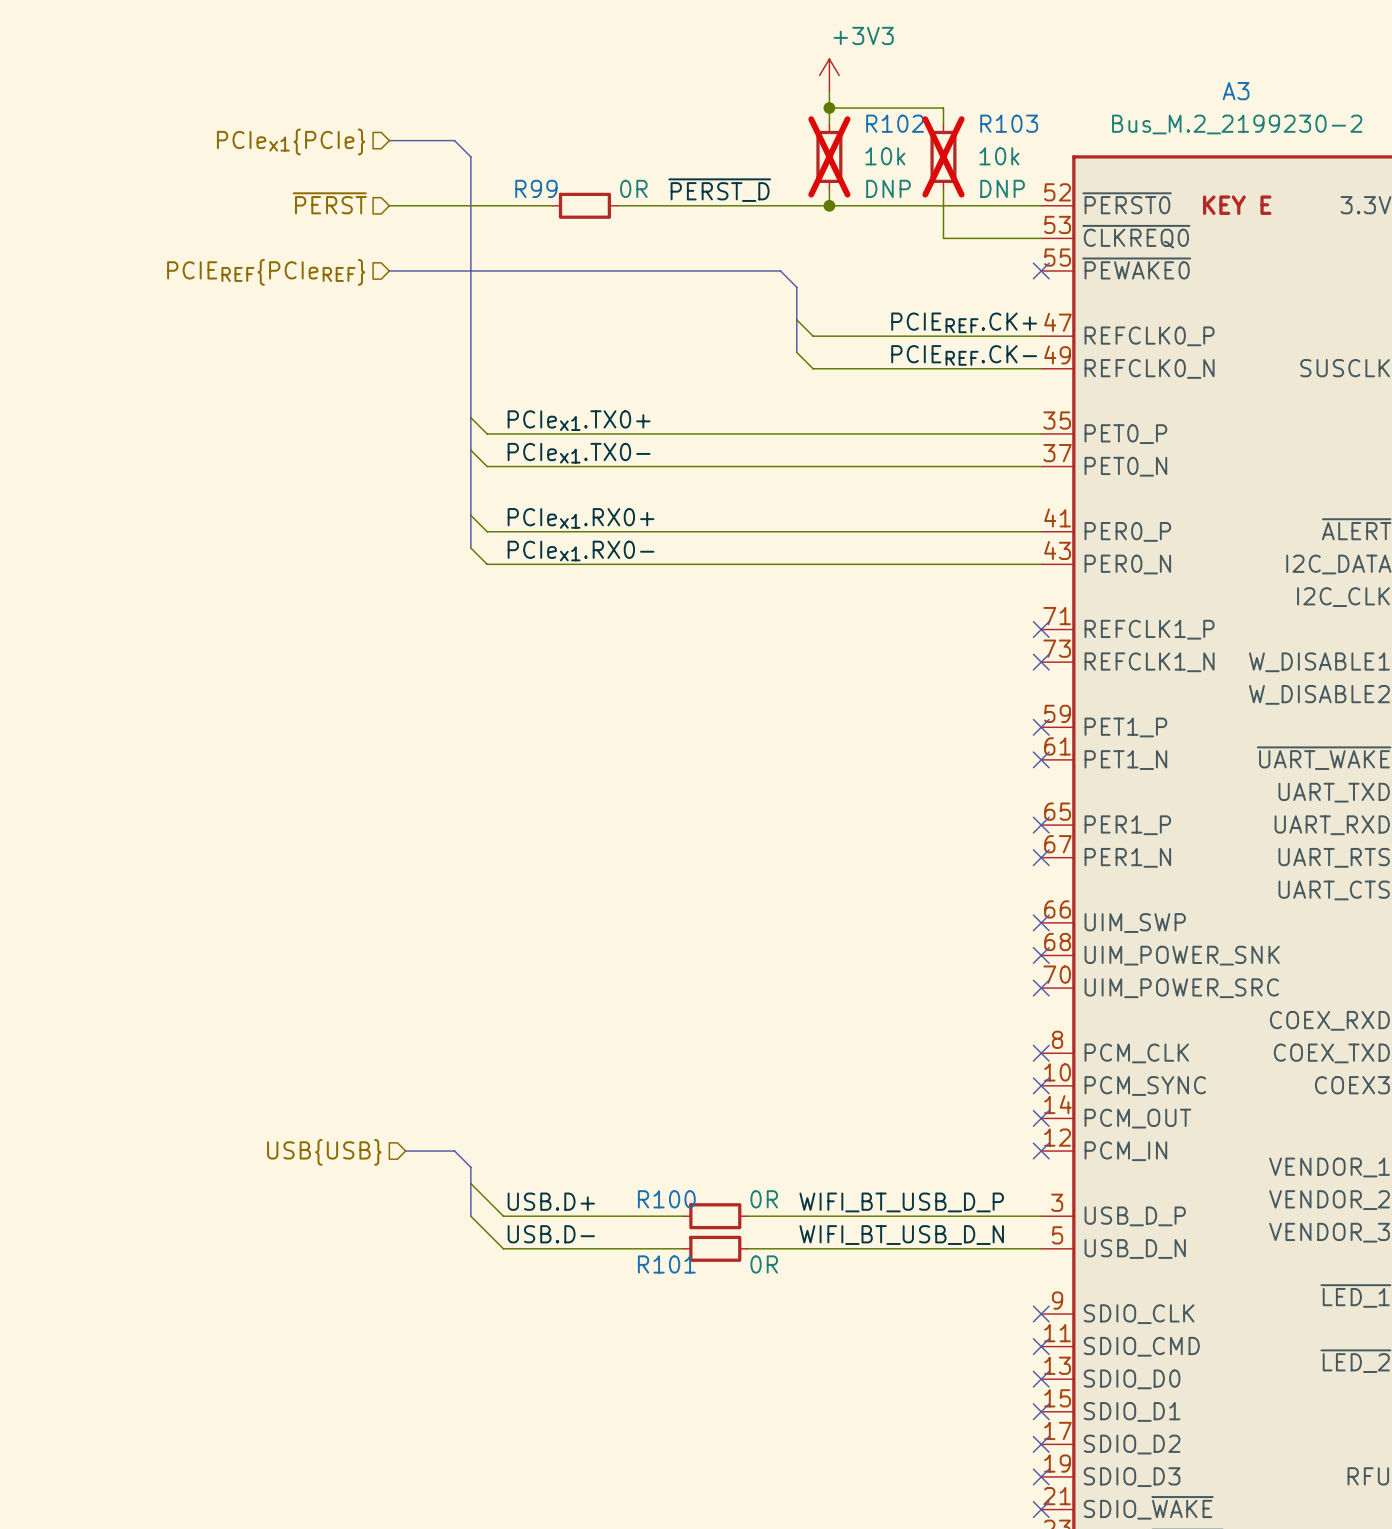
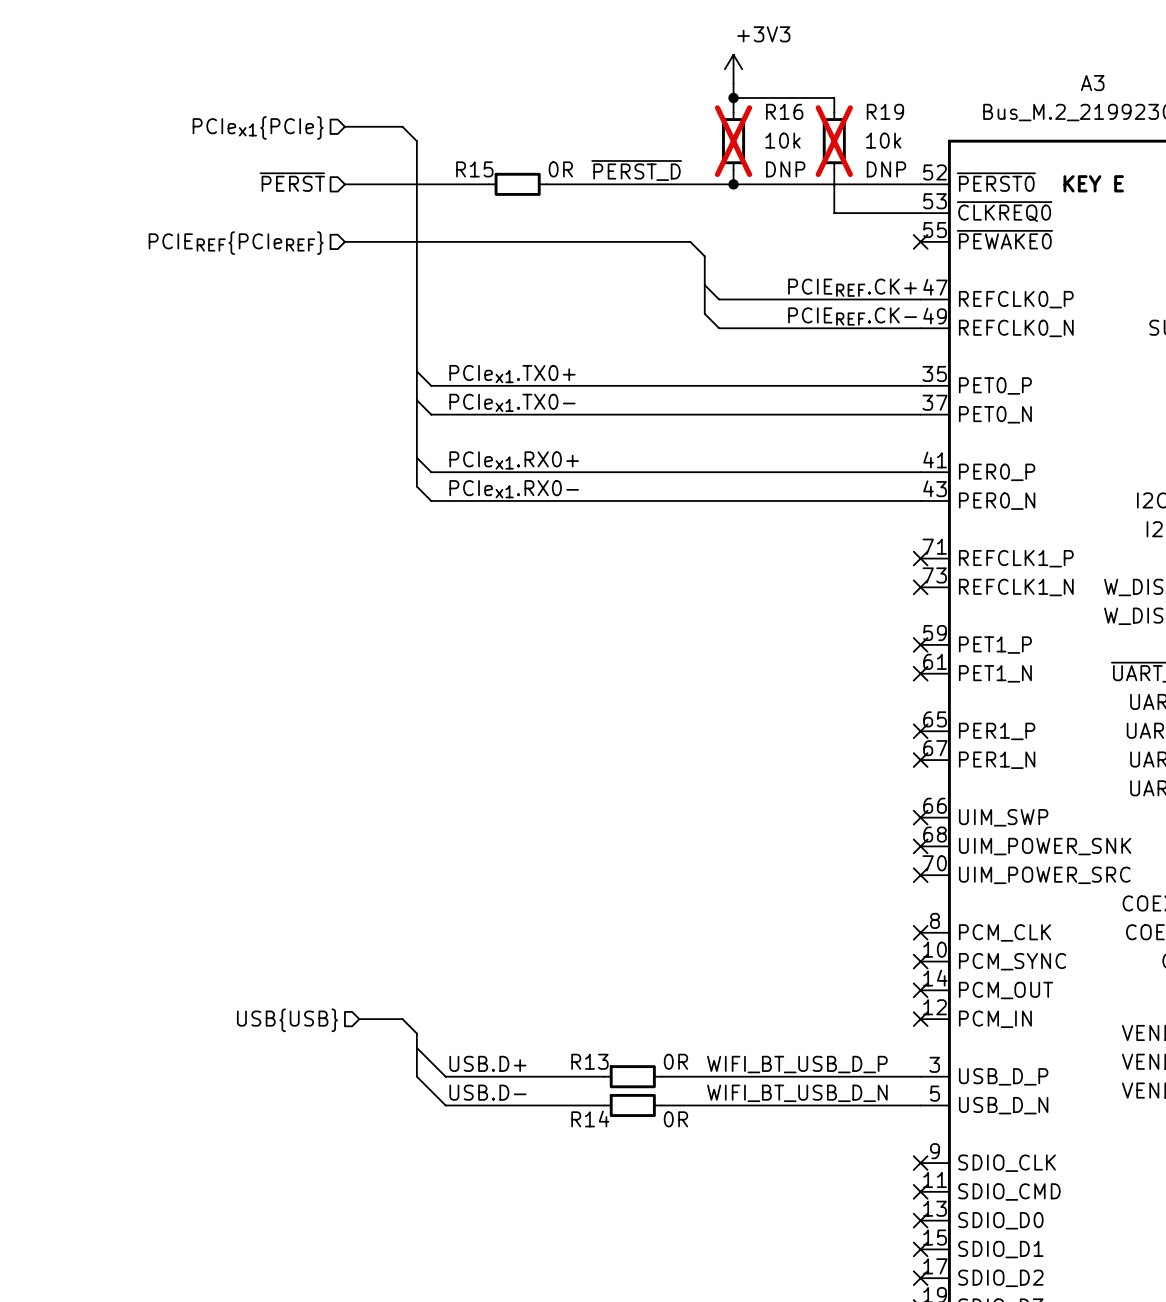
R102 name: R102 (895, 123) -> R16 (784, 111)
R103 name: R103 (1009, 123) -> R19 (885, 111)
R99 name: R99 (536, 188) -> R15 (474, 169)
R100 name: R100 (666, 1199) -> R13 (589, 1061)
R101 name: R101 (666, 1264) -> R14 (590, 1118)

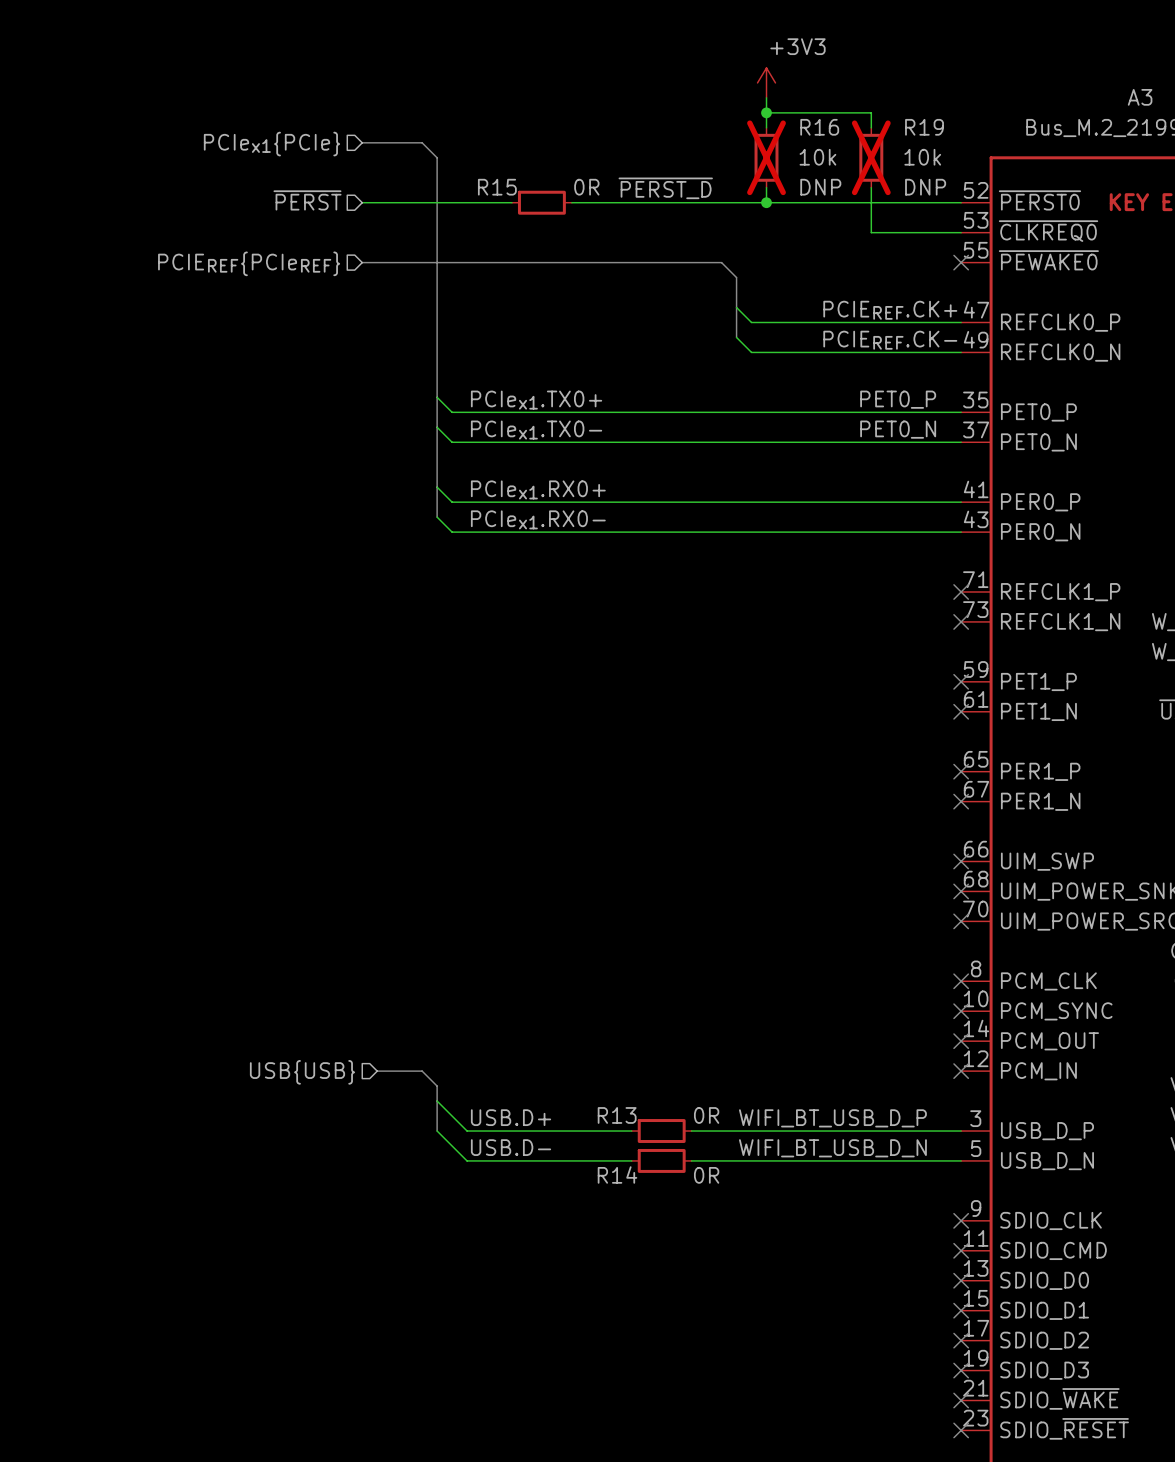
label: none -> PET0_P (898, 399)
label: none -> PET0_N (898, 429)

